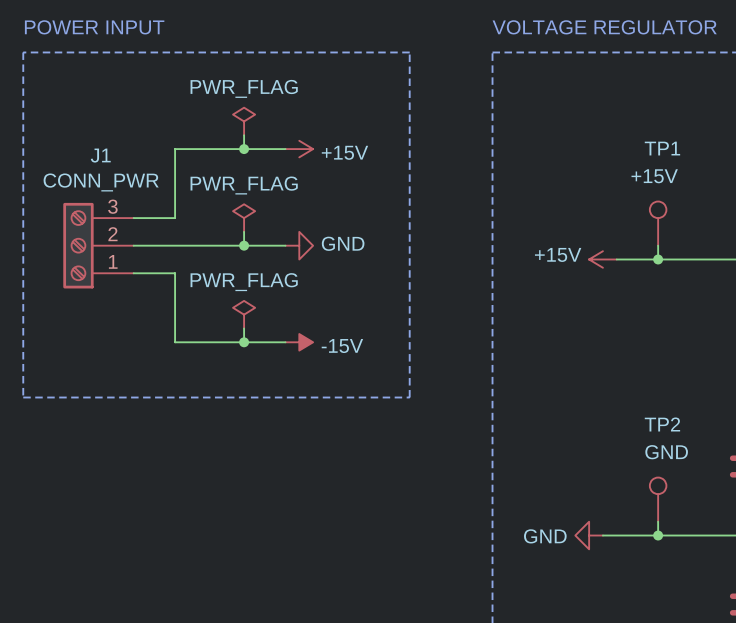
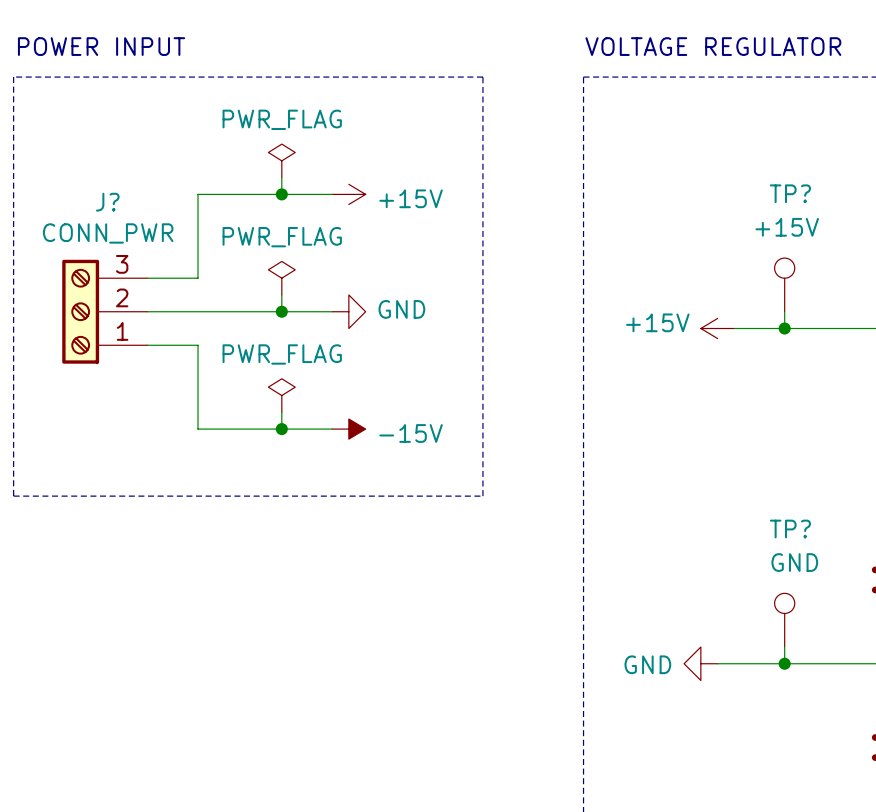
TP1 name: TP1 (662, 148) -> TP? (790, 193)
J1 name: J1 (100, 155) -> J? (107, 202)
TP2 name: TP2 (662, 424) -> TP? (790, 529)

